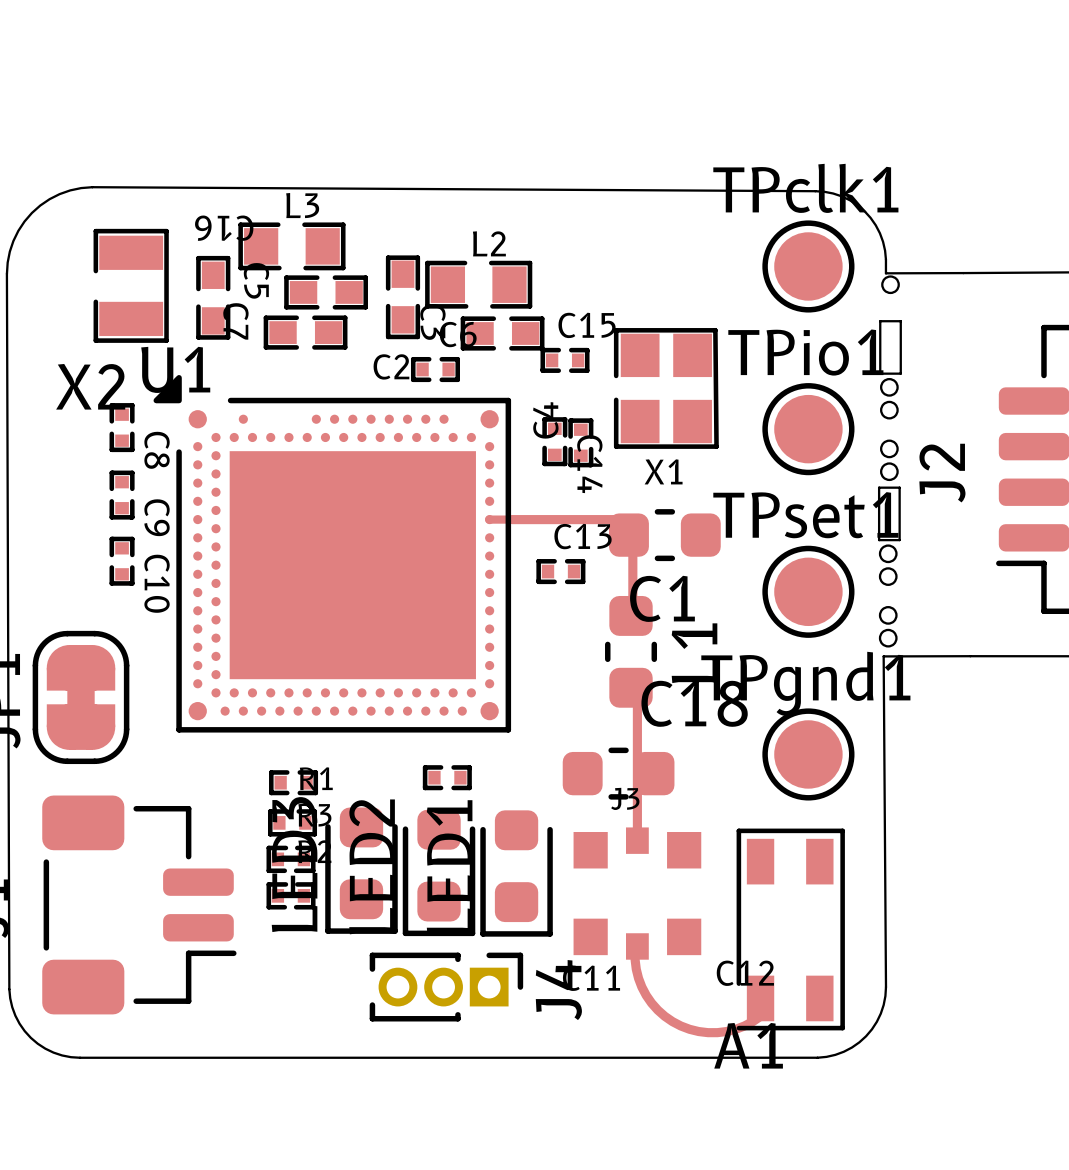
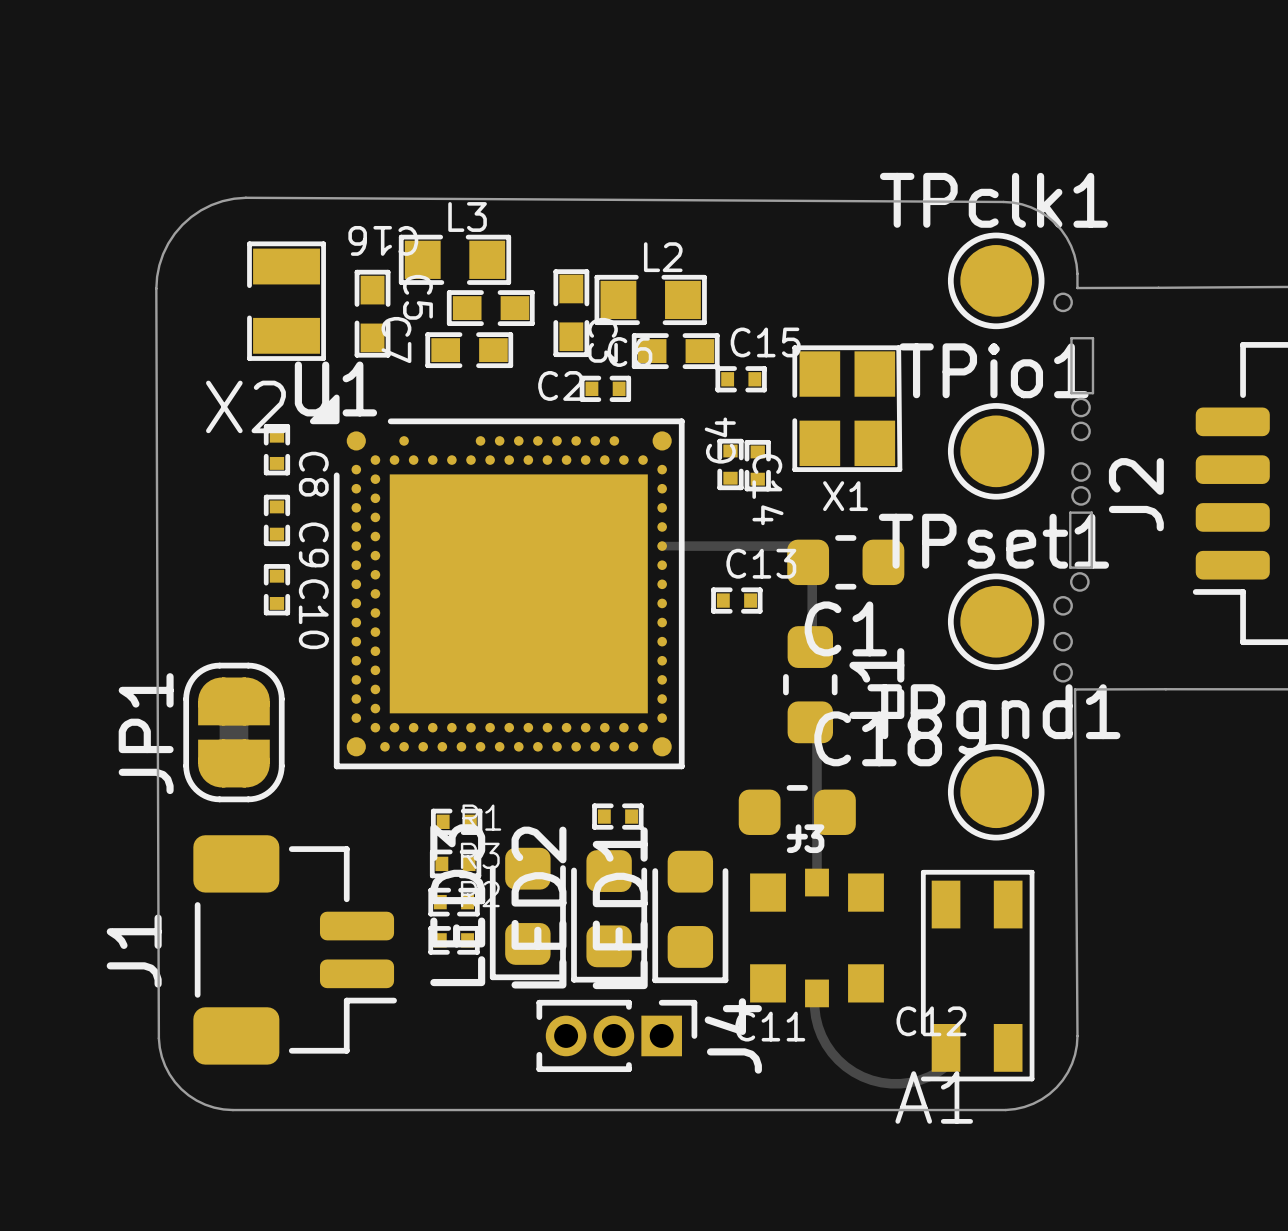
round board edge position: (890, 284) -> (1063, 302)
round board edge position: (888, 576) -> (1063, 605)
round board edge position: (888, 615) -> (1063, 641)
round board edge position: (888, 638) -> (1063, 672)

